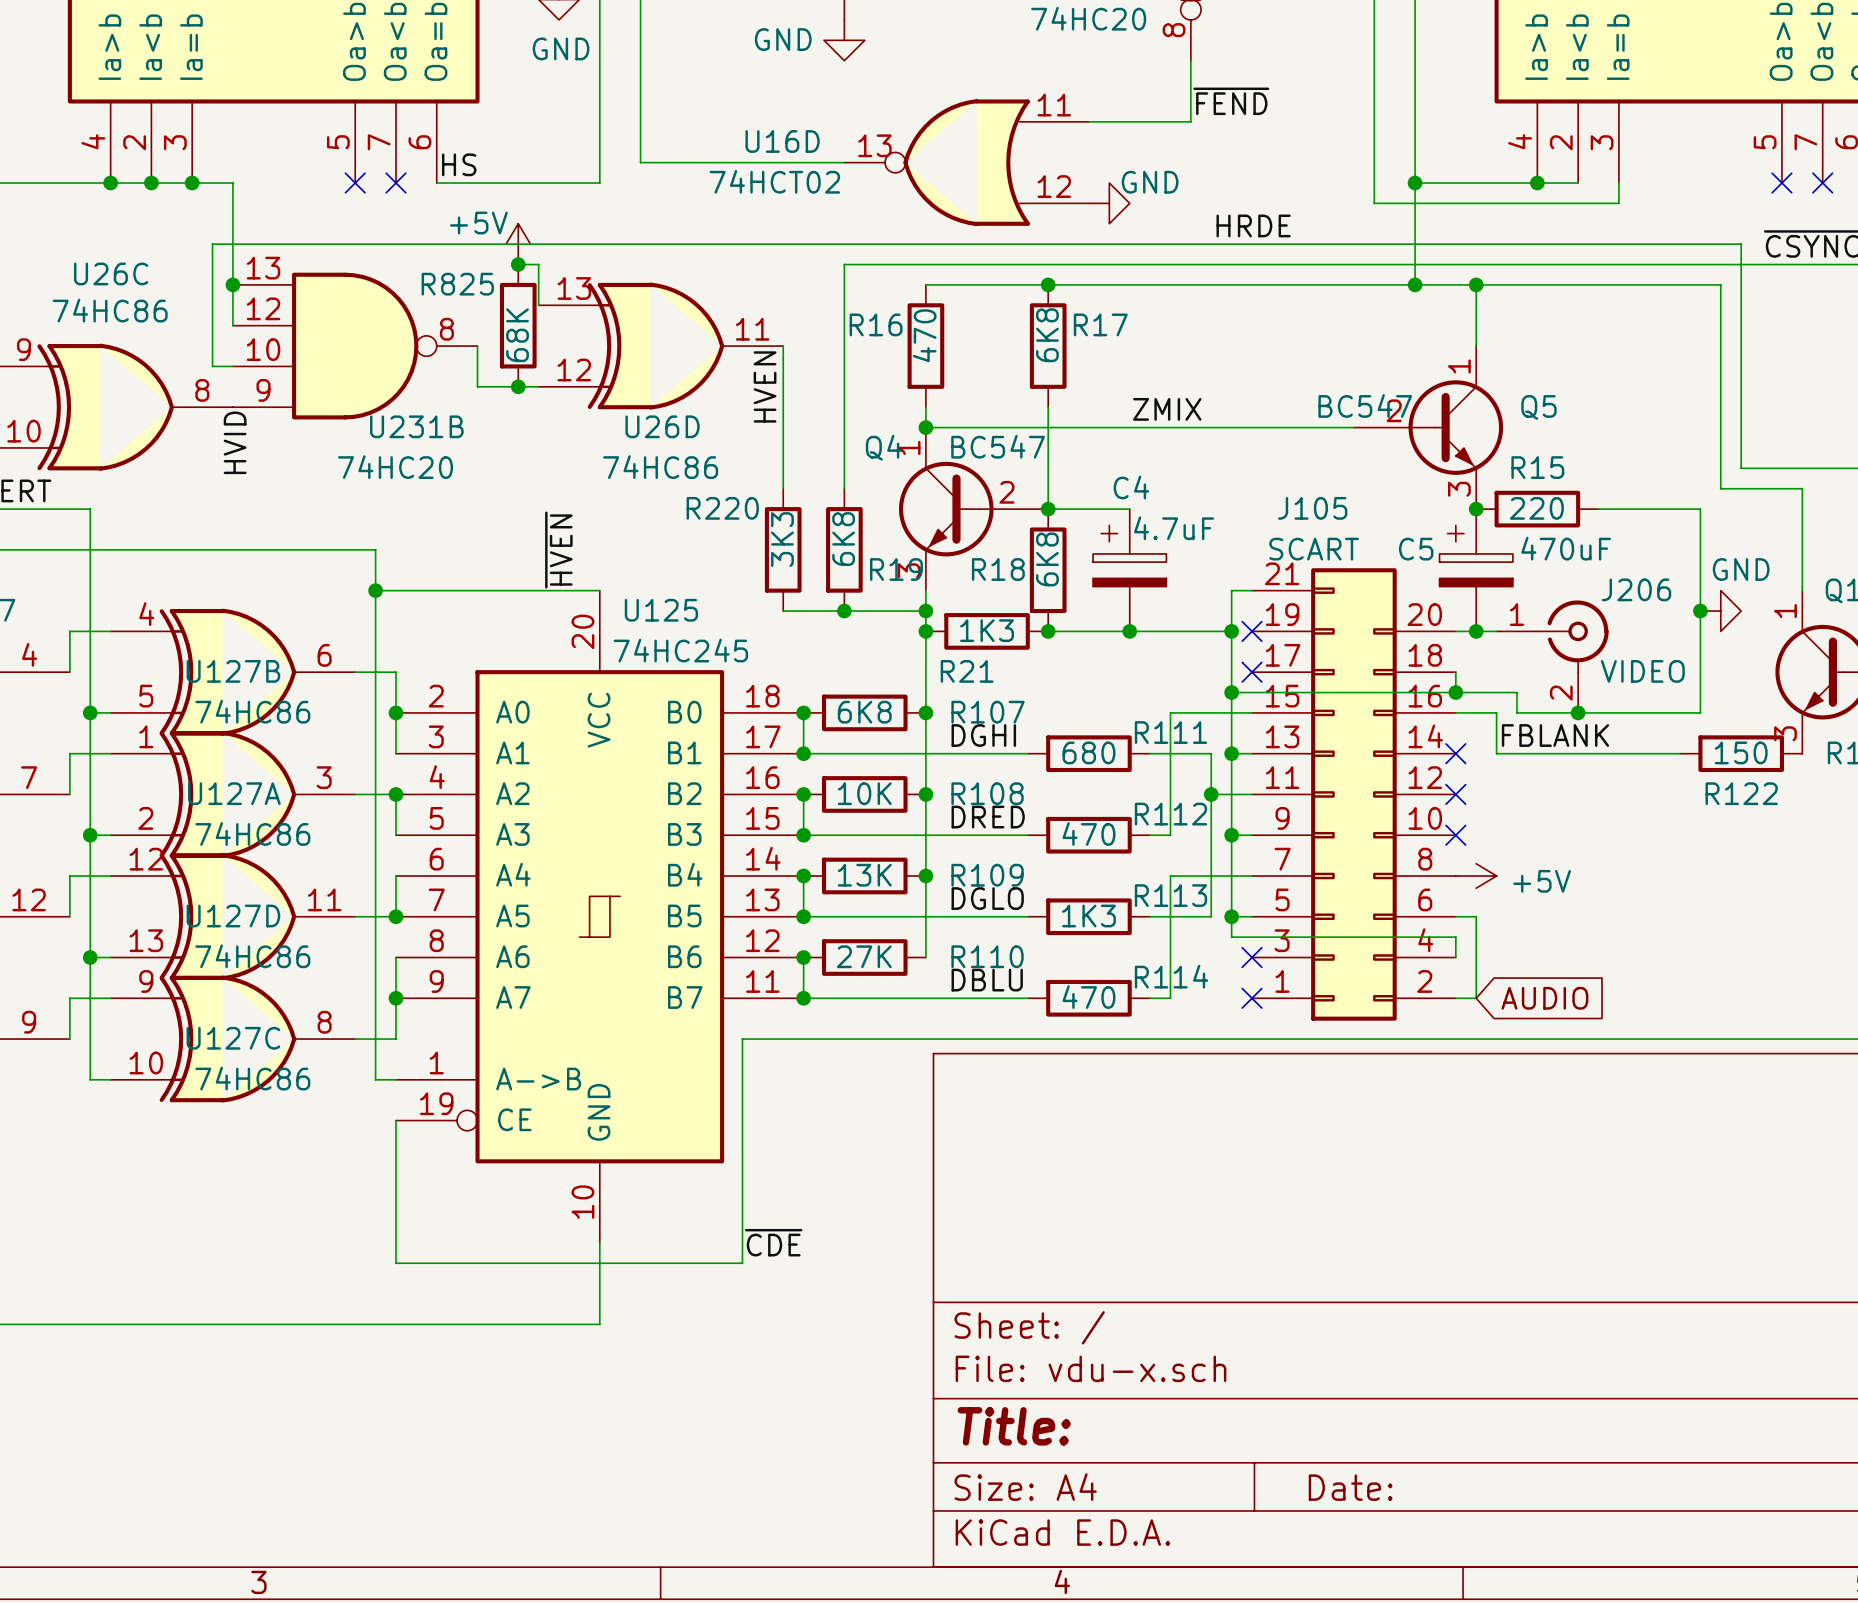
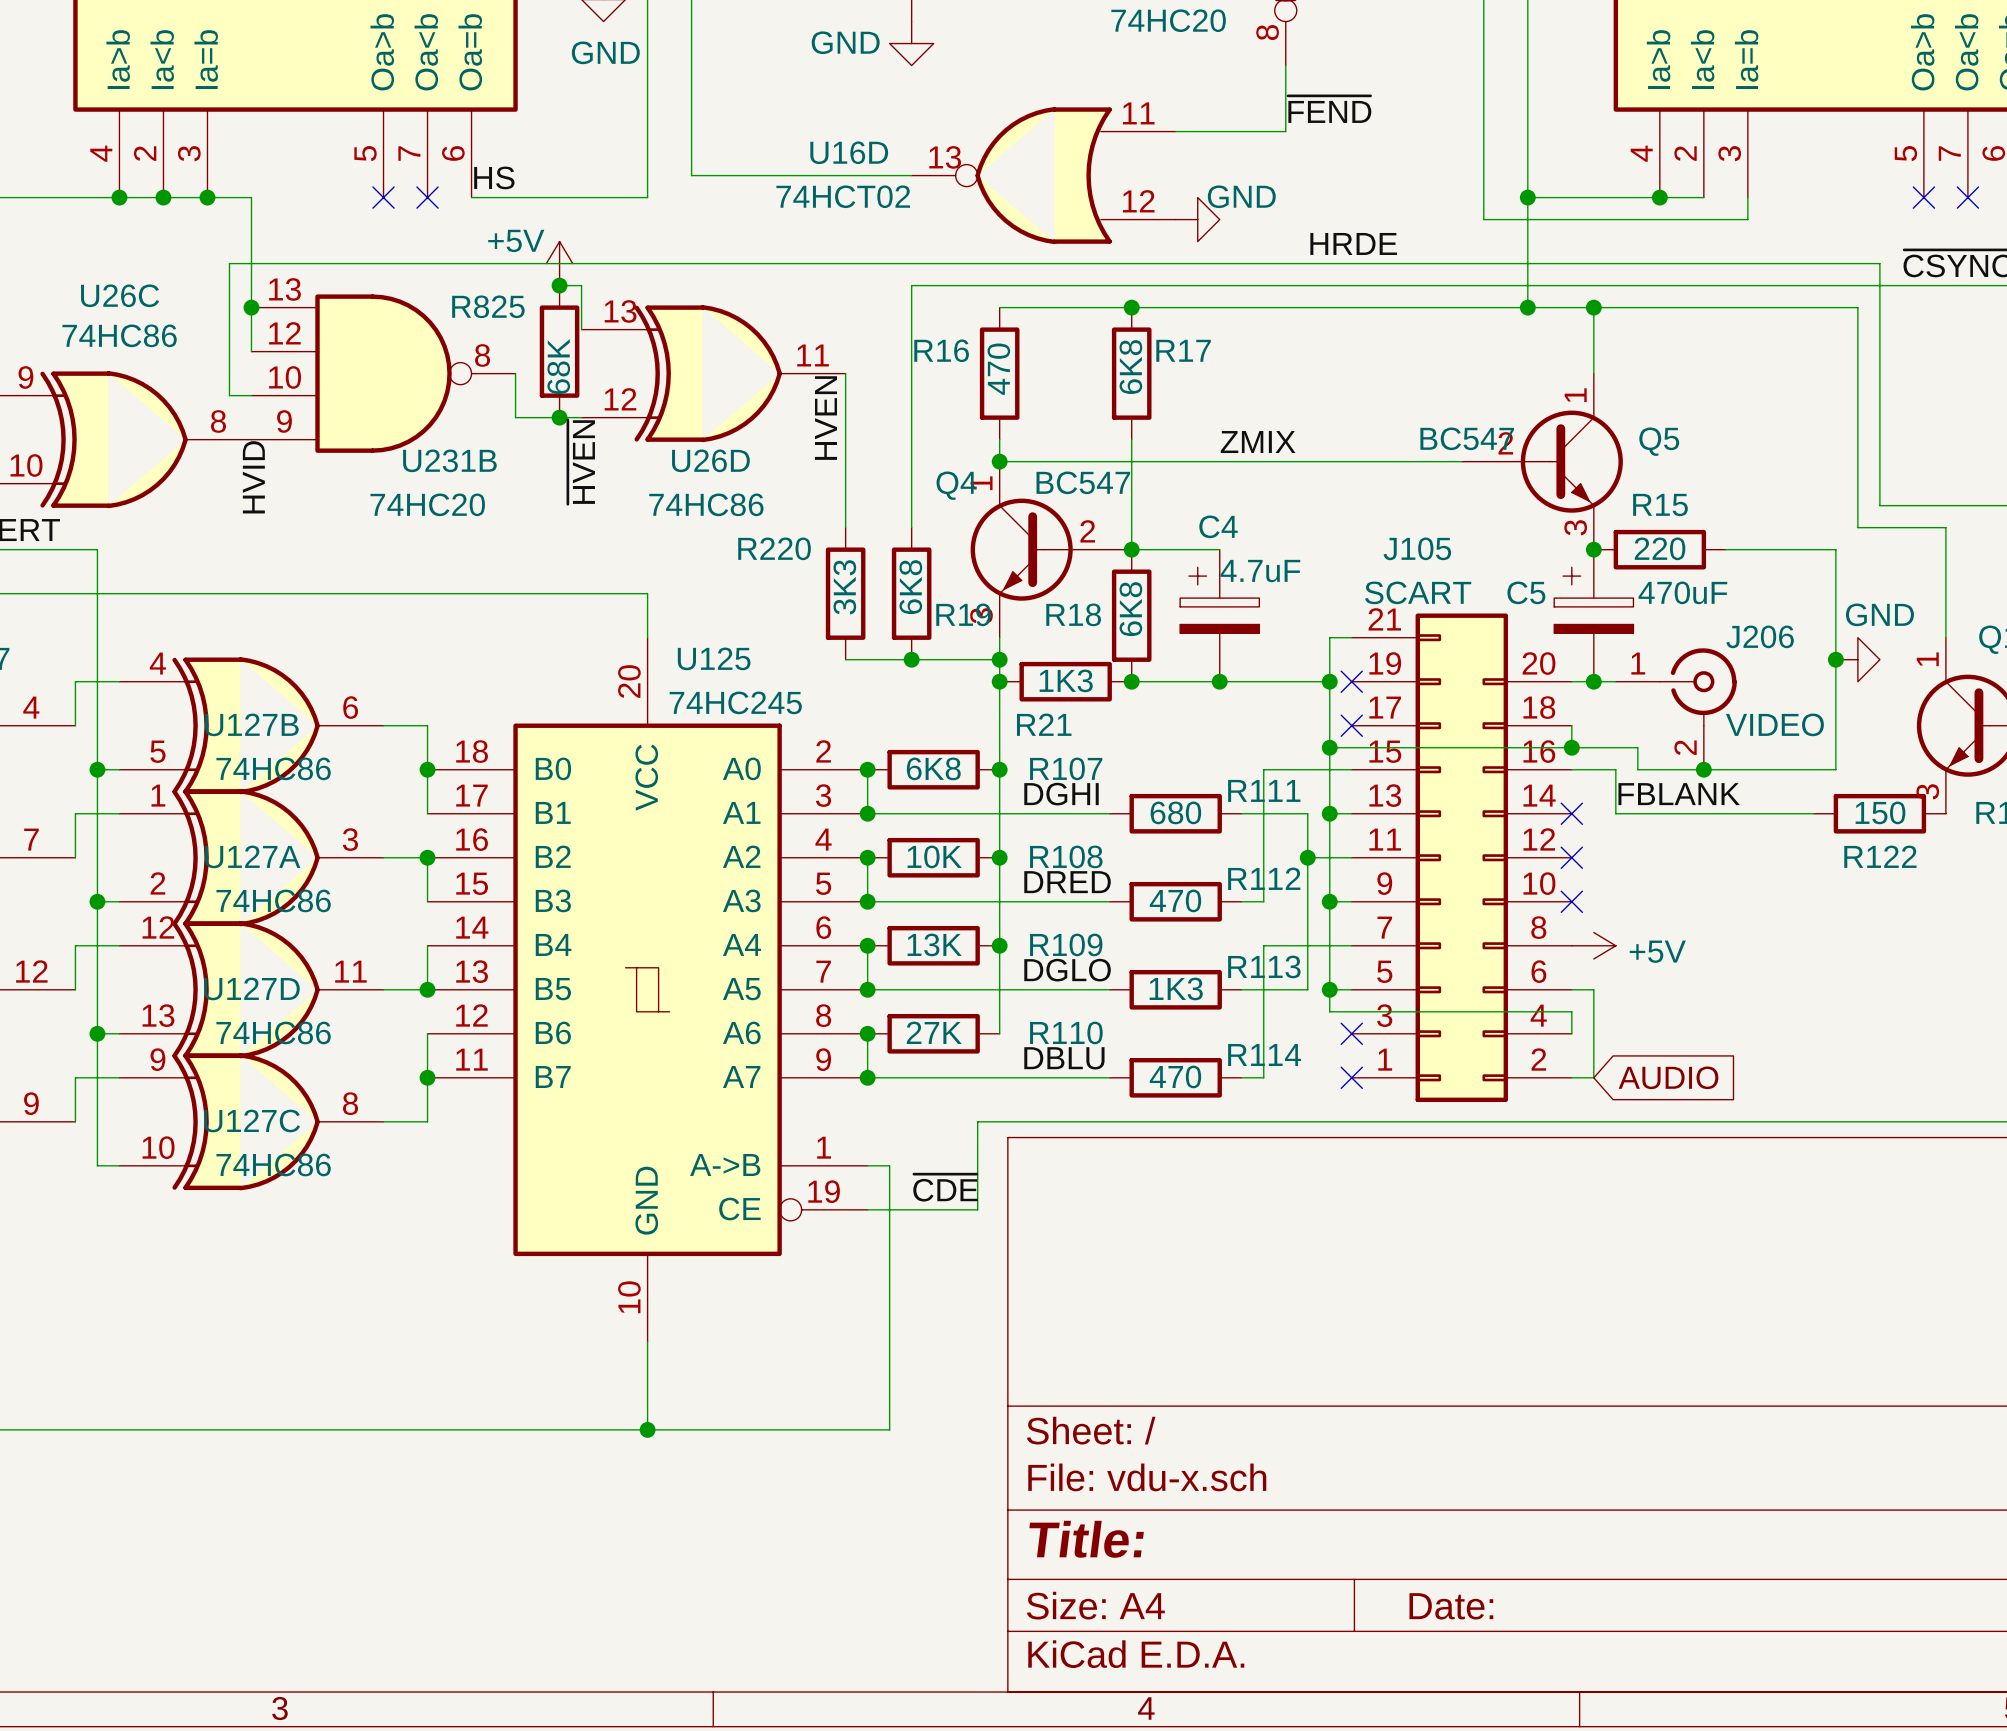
wire: (375, 549) (375, 1079) (395, 1079) -> none
label position: ~{HVEN} (558, 550) -> ~{HVEN} (581, 462)
wire: (375, 590) (599, 590) -> (405, 593) (647, 593) (647, 637)
junction: (375, 590) -> none
U125 flip: as is (599, 916) -> left-right (647, 989)
wire: (905, 1039) (742, 1039) (742, 1263) (395, 1263) (395, 1120) -> (977, 1121) (977, 1209) (867, 1209)
wire: none -> (867, 1165) (889, 1165) (889, 1429) (647, 1429)
label position: ~{CDE} (773, 1242) -> ~{CDE} (945, 1187)
junction: none -> (647, 1429)

